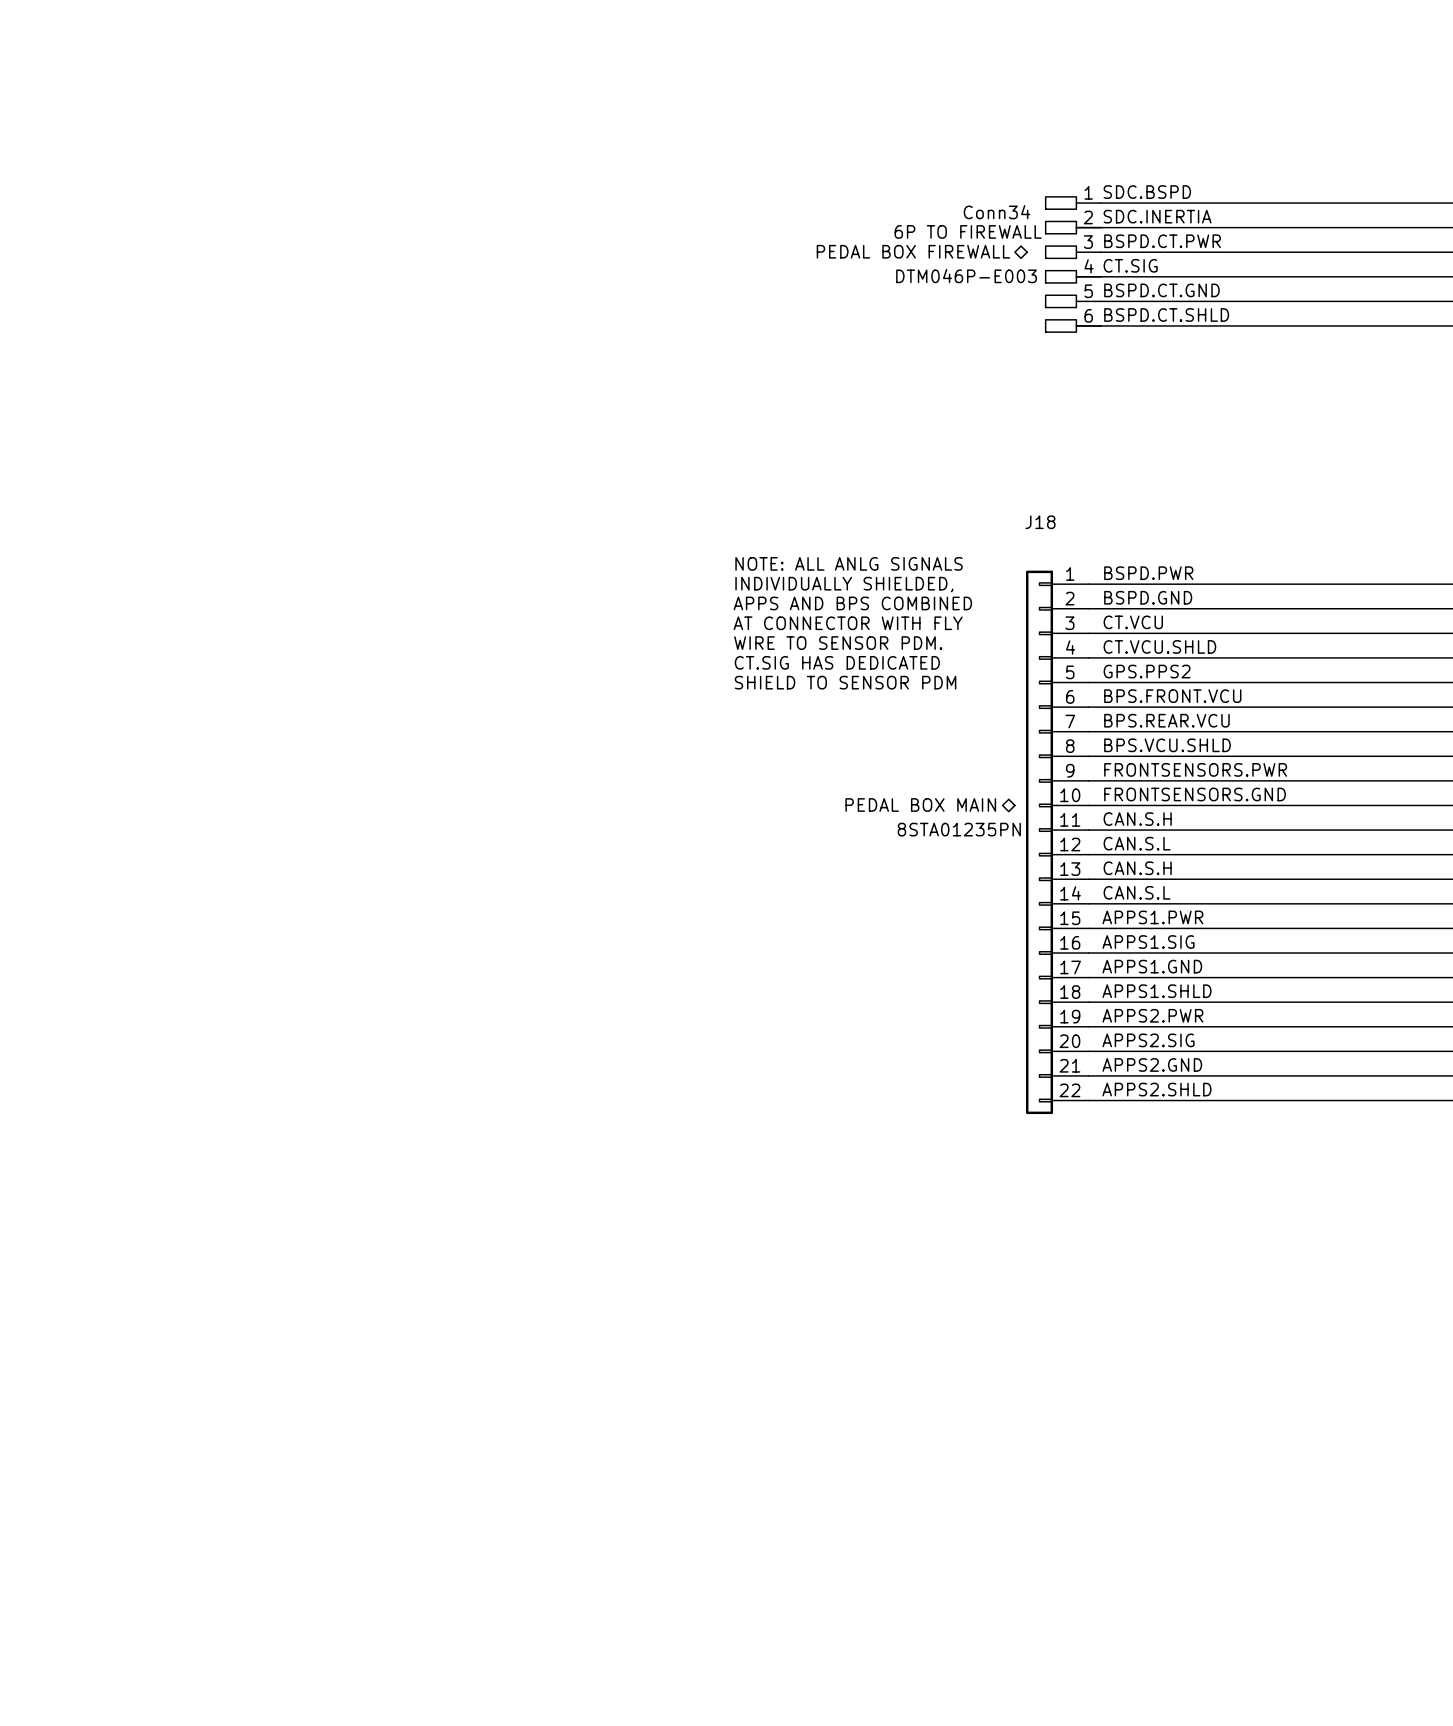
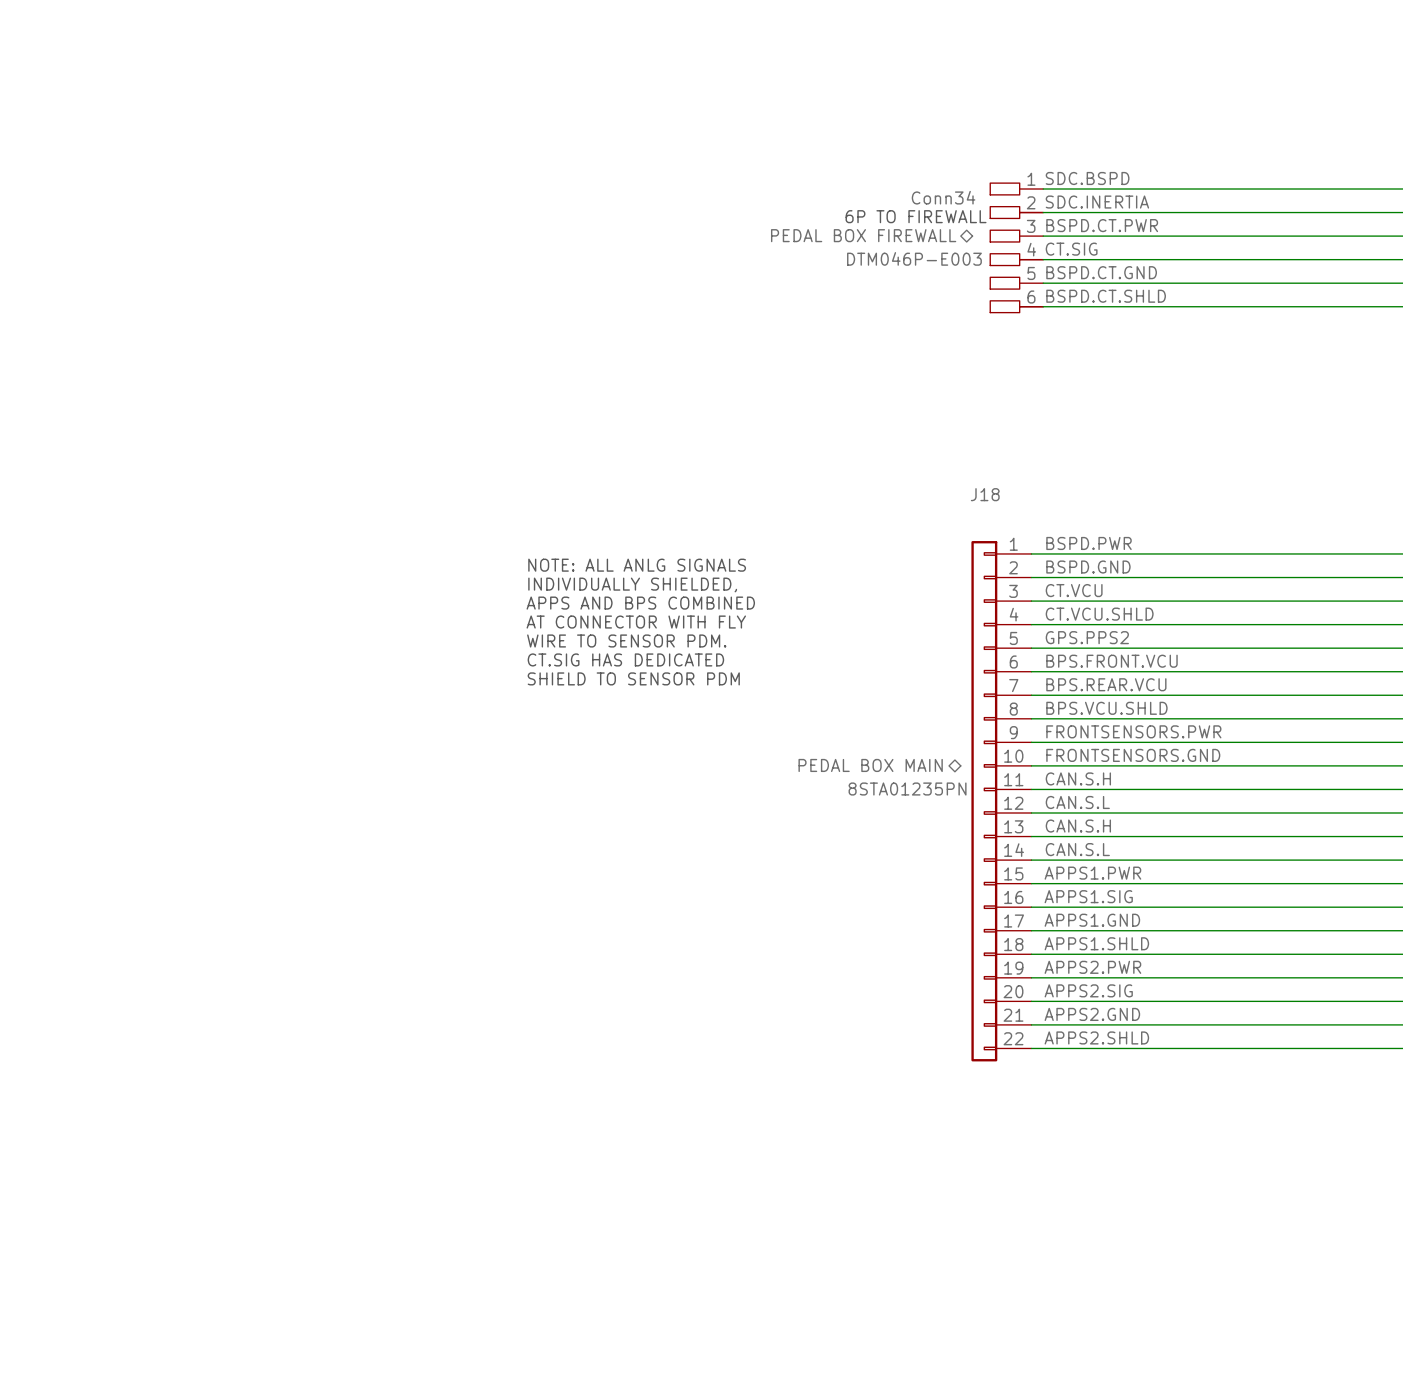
text position: NOTE: ALL ANLG SIGNALS (849, 563) -> NOTE: ALL ANLG SIGNALS (637, 565)
text position: INDIVIDUALLY SHIELDED, (844, 584) -> INDIVIDUALLY SHIELDED, (632, 584)
text position: APPS AND BPS COMBINED (852, 603) -> APPS AND BPS COMBINED (640, 603)
text position: AT CONNECTOR WITH FLY (848, 623) -> AT CONNECTOR WITH FLY (636, 622)
text position: WIRE TO SENSOR PDM. (838, 643) -> WIRE TO SENSOR PDM. (626, 640)
text position: CT.SIG HAS DEDICATED (837, 662) -> CT.SIG HAS DEDICATED (625, 659)
text position: SHIELD TO SENSOR PDM (845, 682) -> SHIELD TO SENSOR PDM (633, 678)

